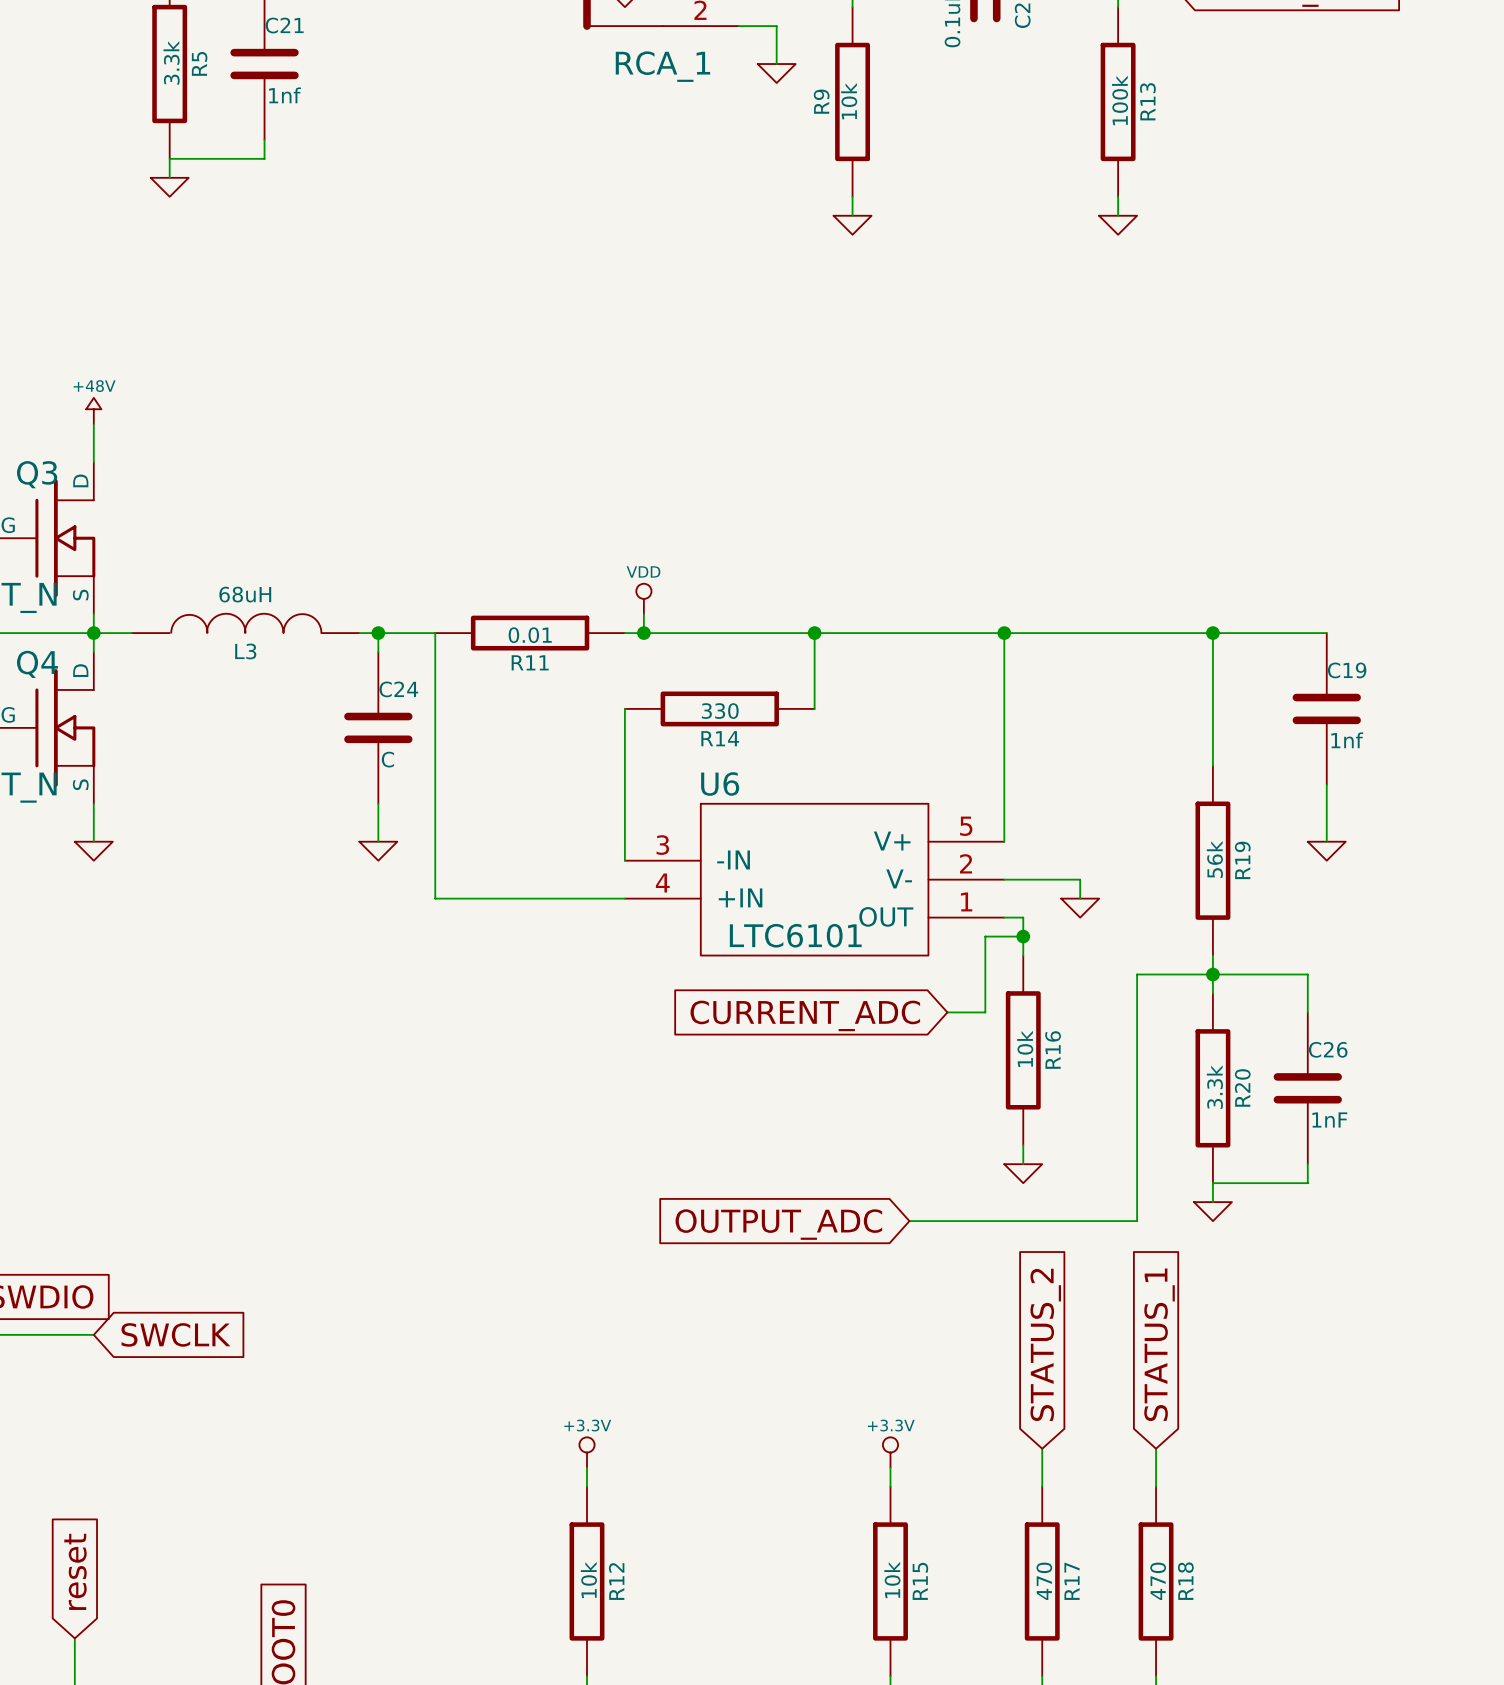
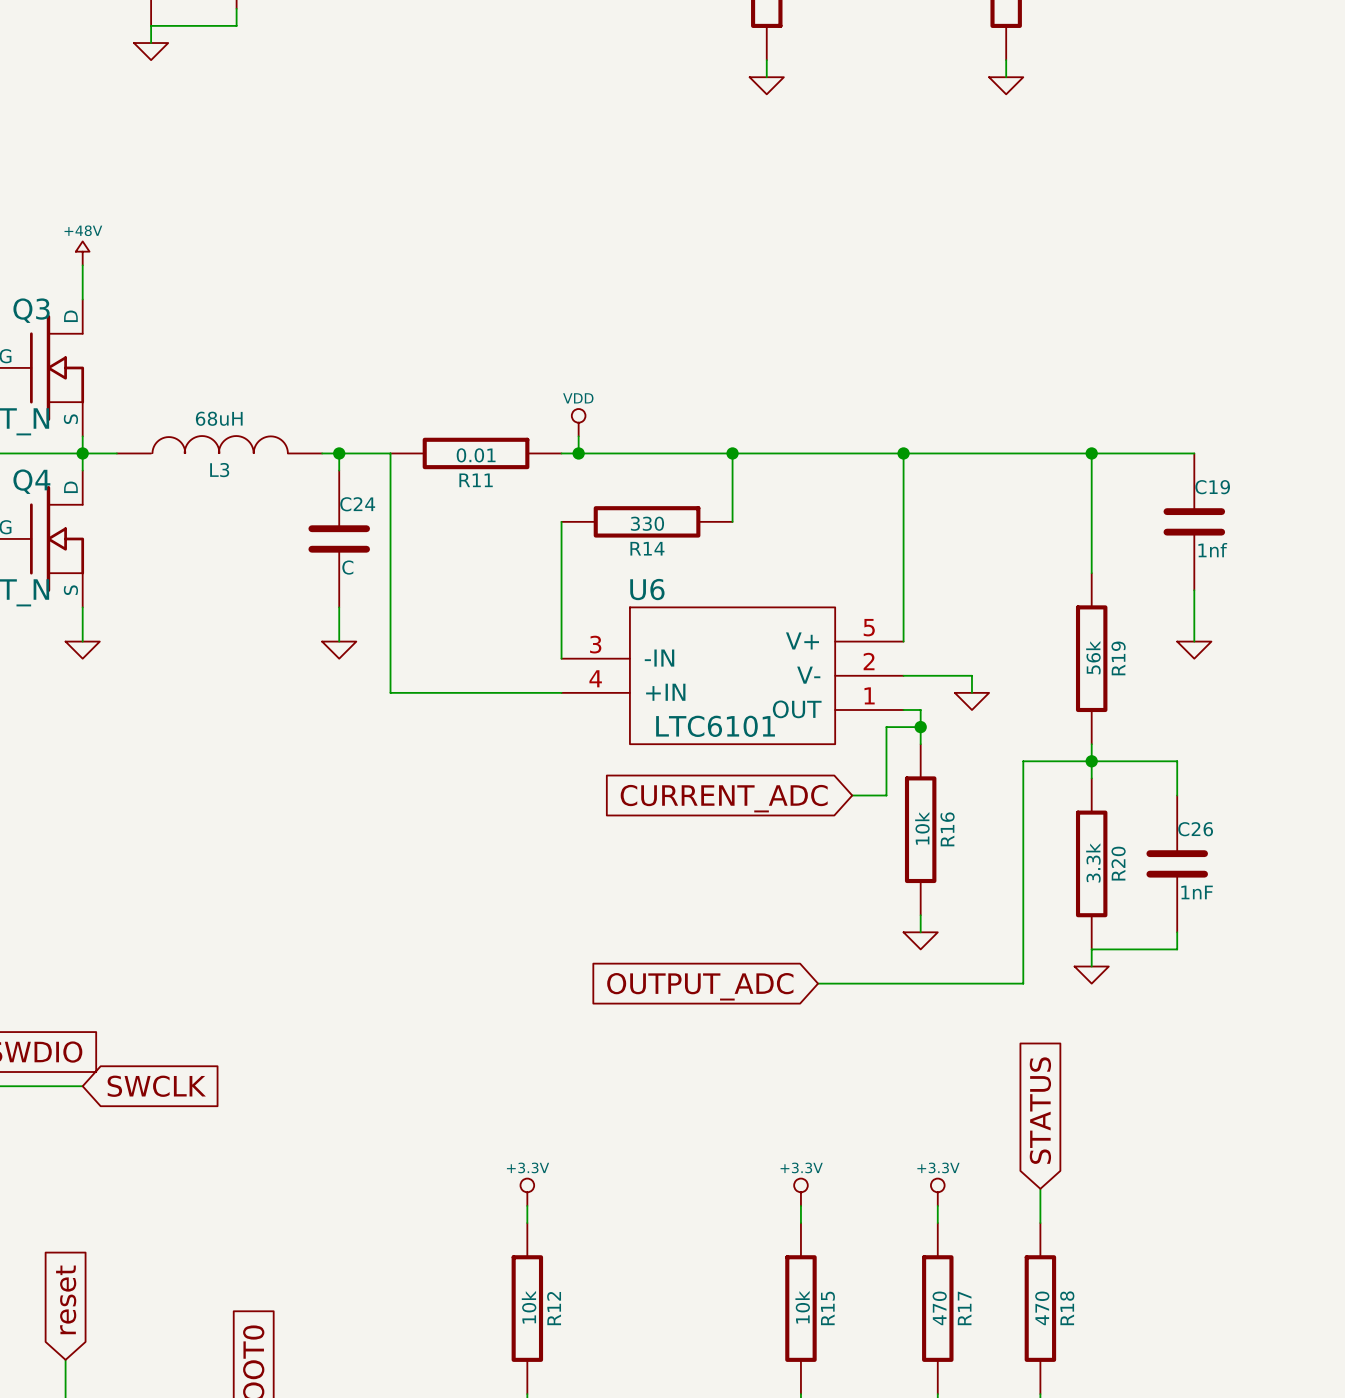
global label: STATUS_2 (1045, 1344) -> none
global label: STATUS_1 (1159, 1344) -> STATUS (1040, 1110)
power symbol: none -> +3.3V (937, 1192)

